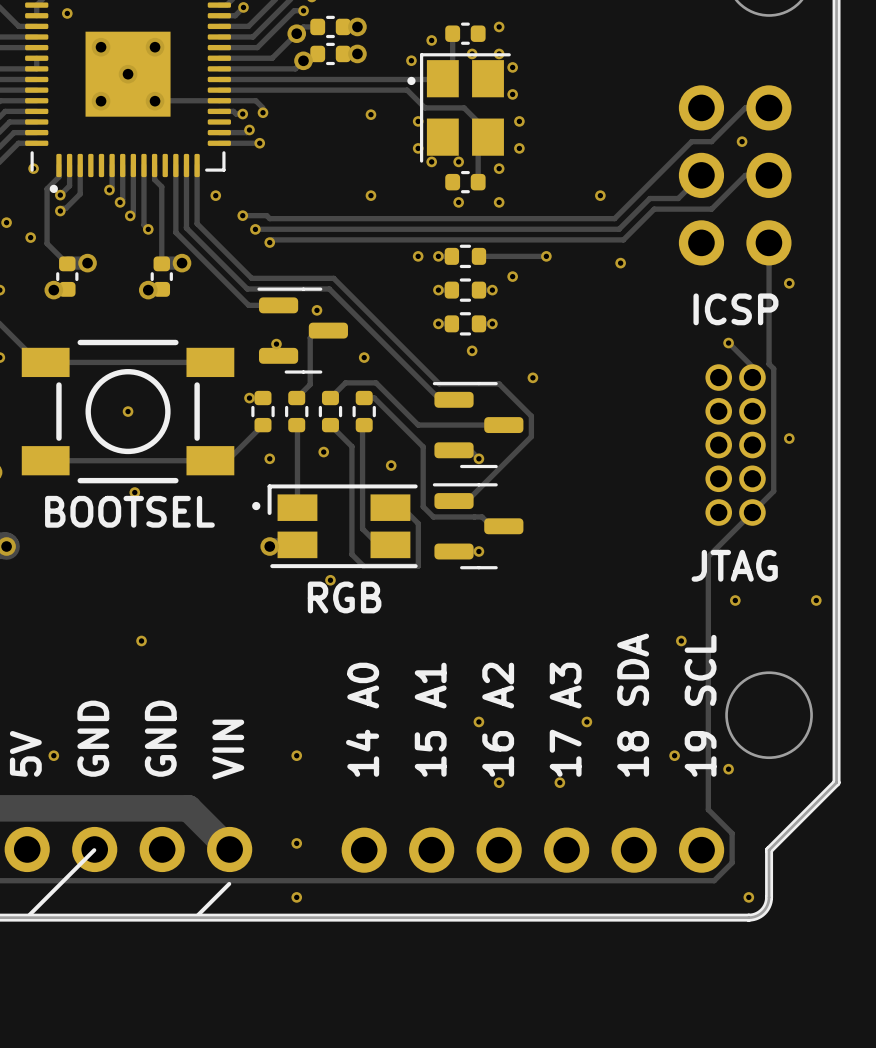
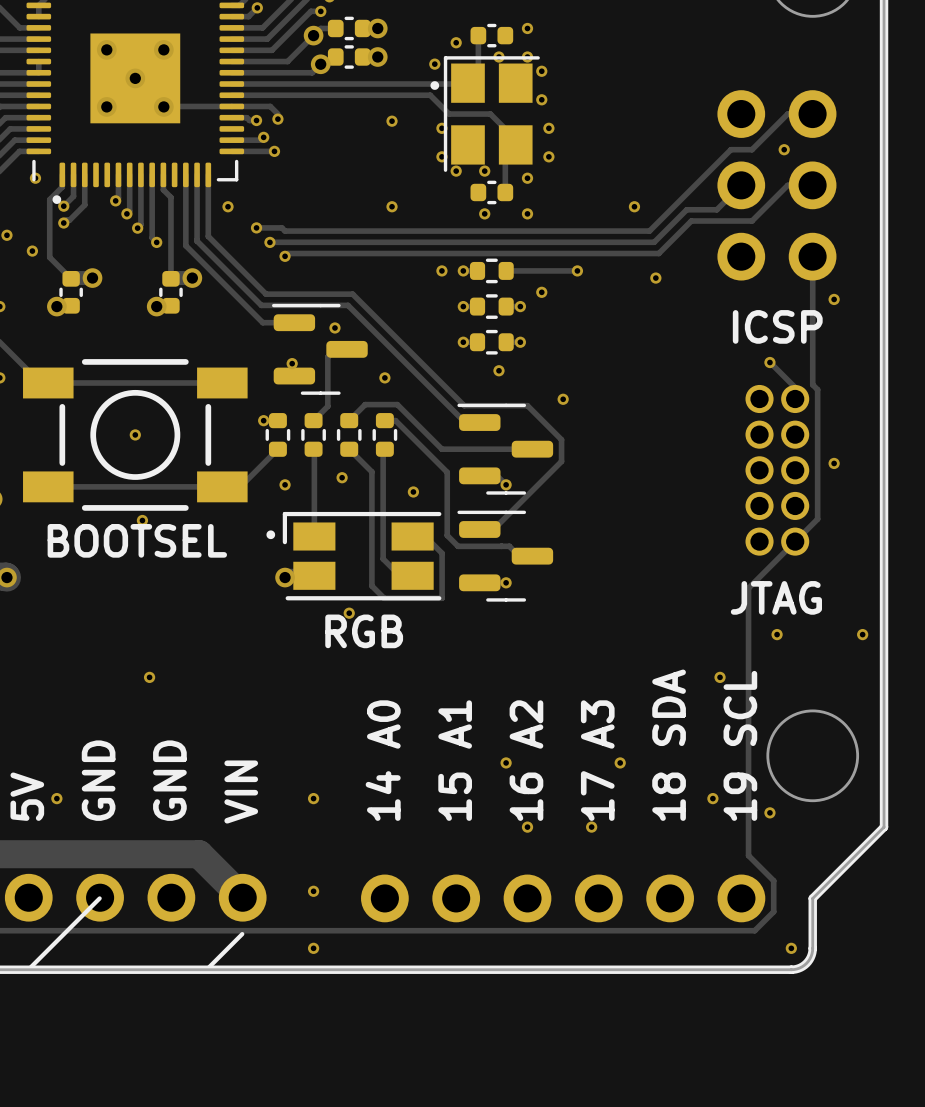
via: (67, 13) -> none

